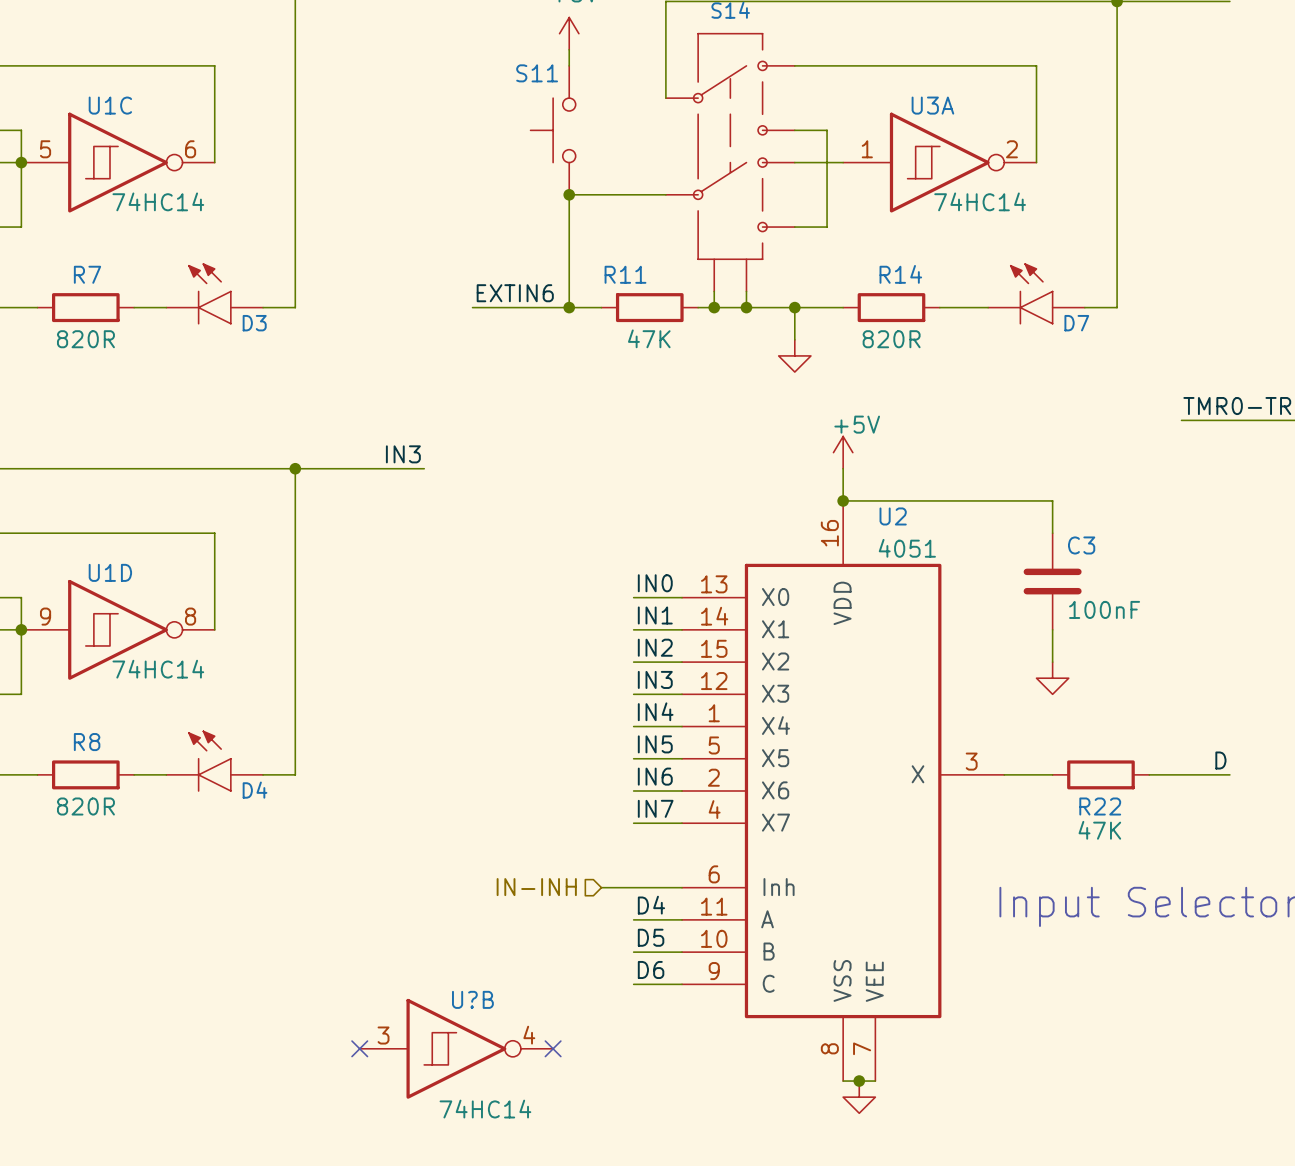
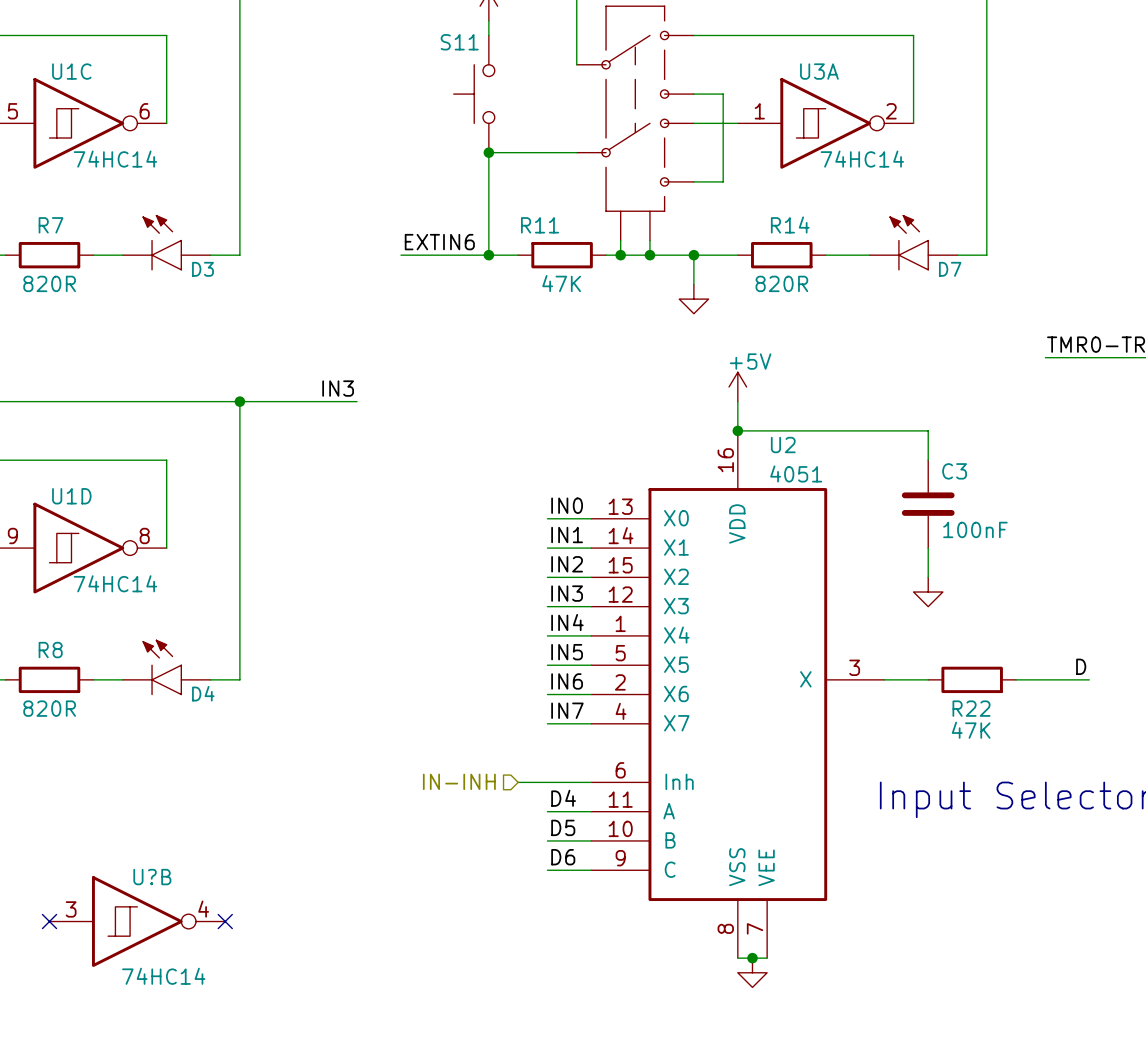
no-connect mark: none -> (49, 921)
no-connect mark: none -> (225, 921)
no-connect mark: (359, 1048) -> none
U?B position: (456, 1048) -> (137, 921)
no-connect mark: (553, 1048) -> none

